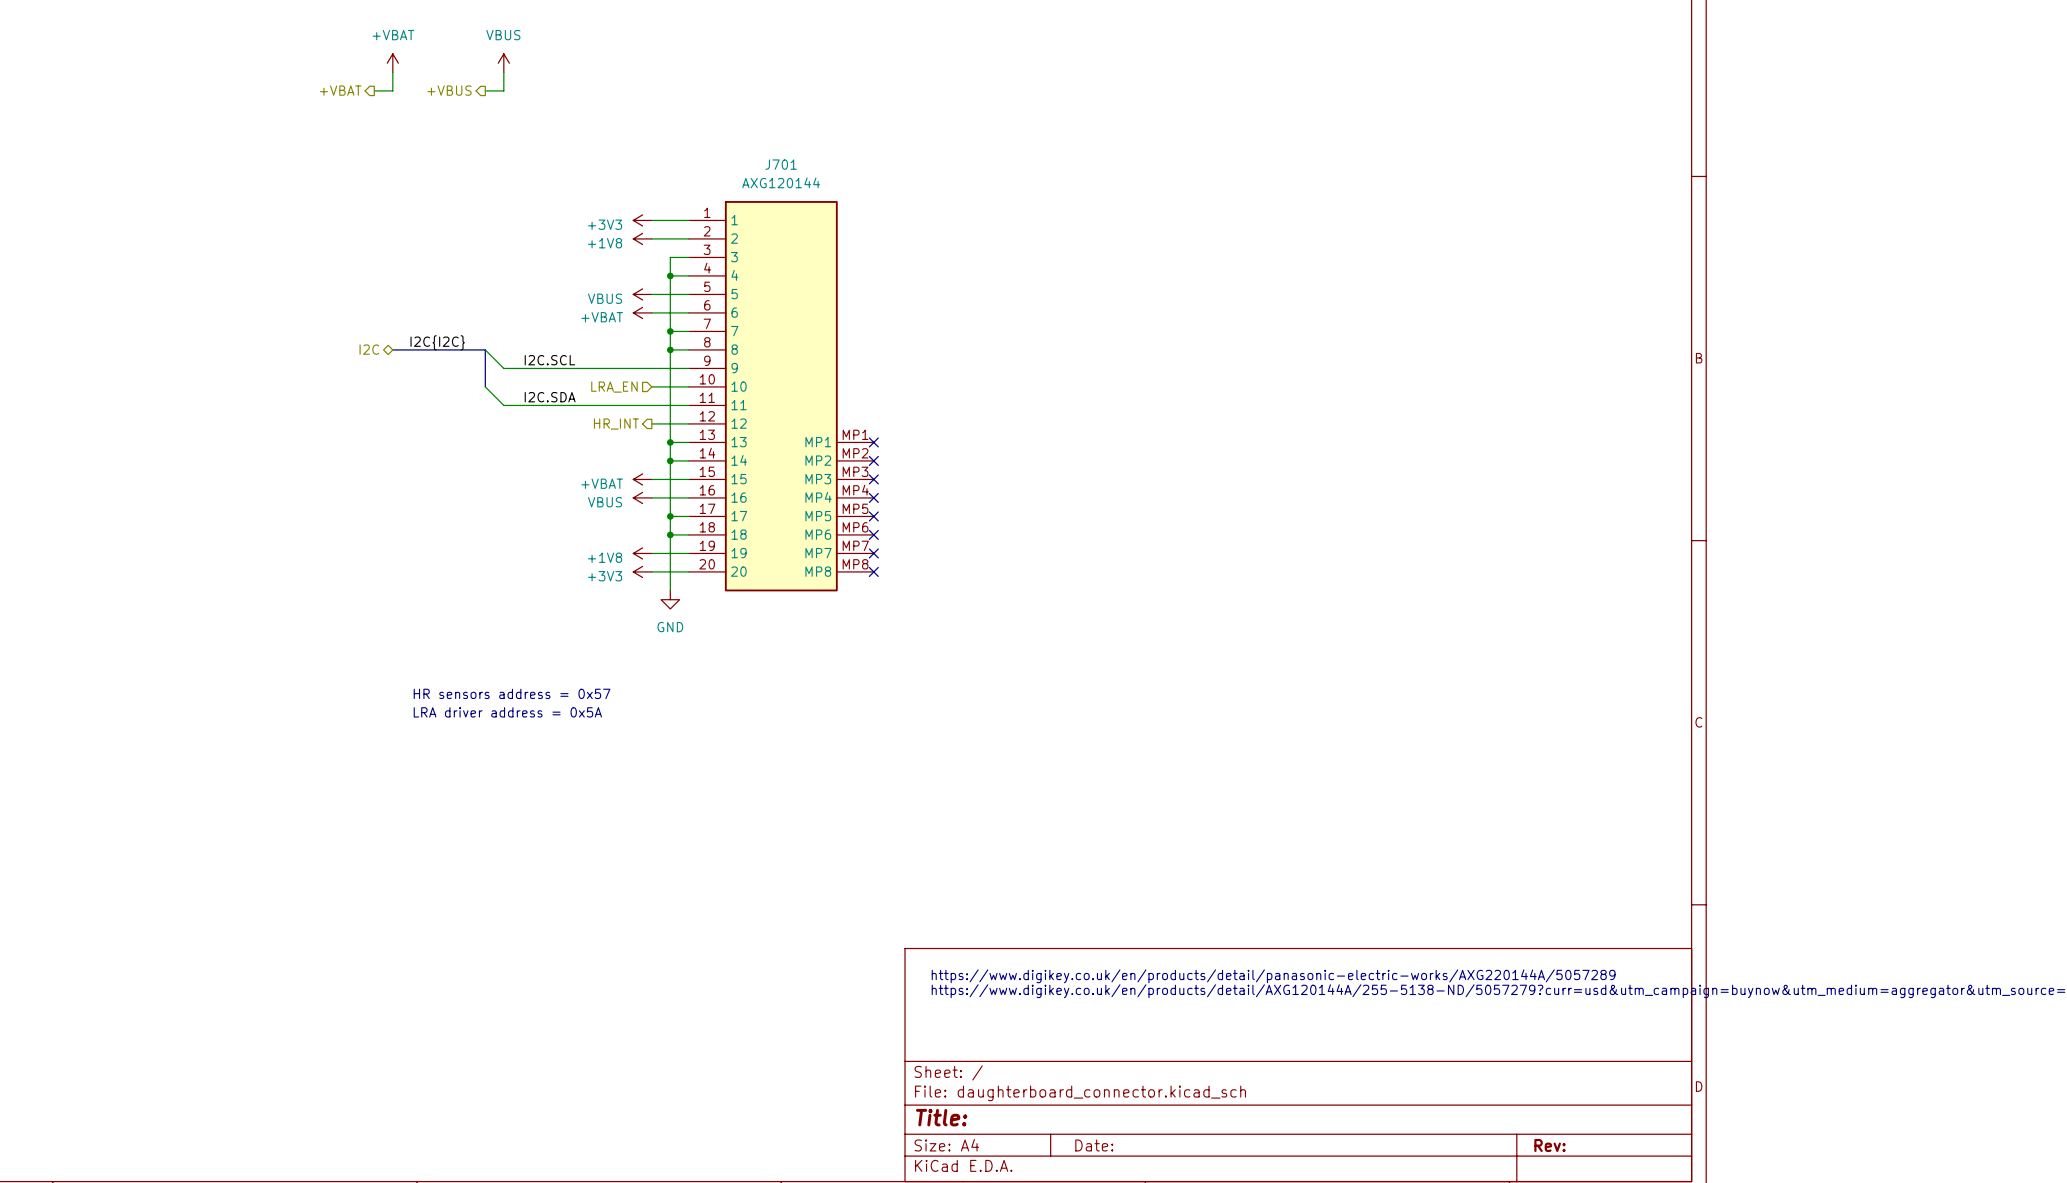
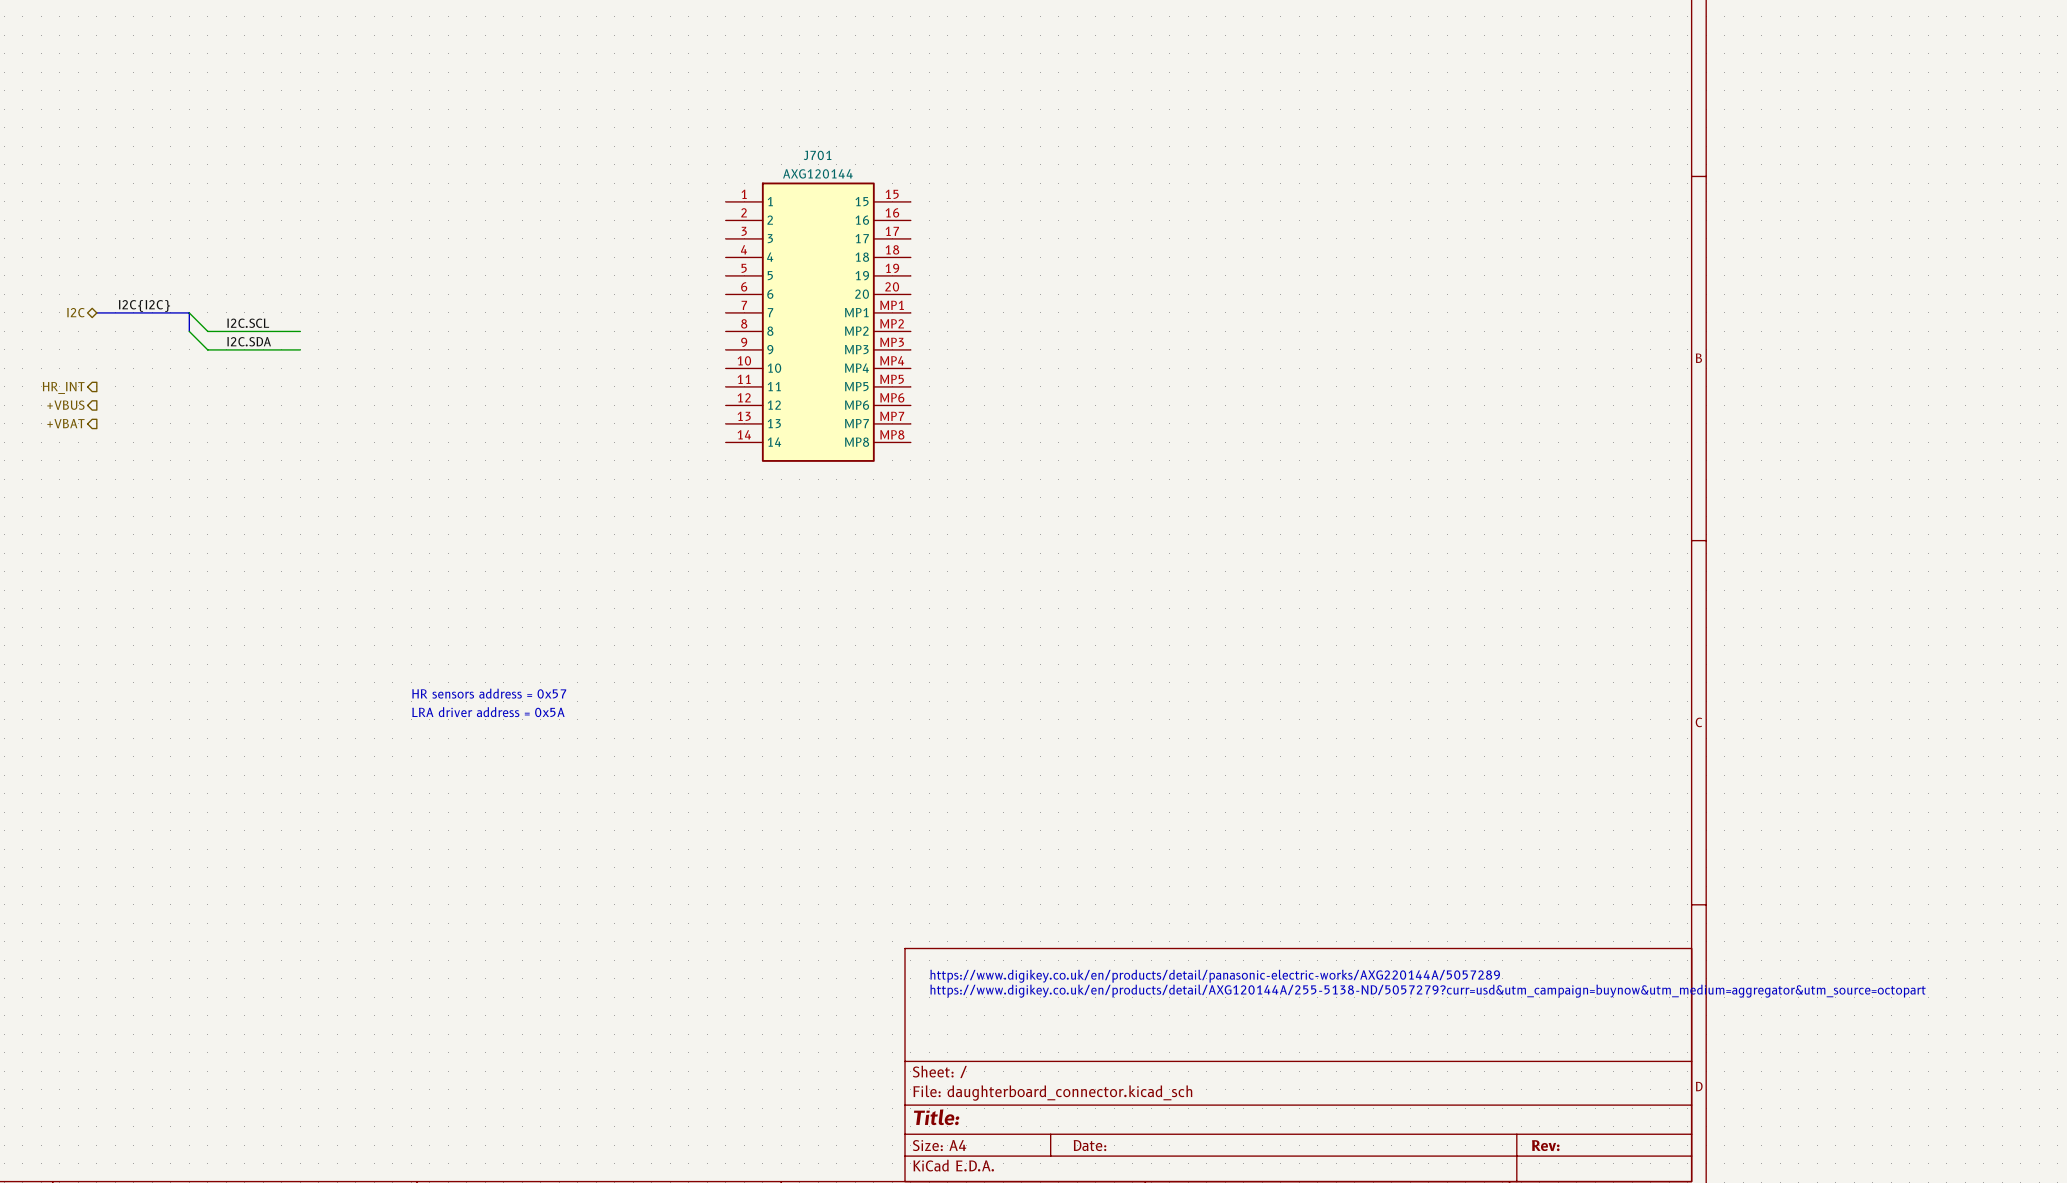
power symbol: +VBAT (392, 63) -> none
power symbol: VBUS (503, 63) -> none
wire: (392, 72) (392, 90) (374, 90) -> none
wire: (503, 72) (503, 90) (485, 90) -> none
hierarchical label: +VBAT (340, 90) -> none
hierarchical label: +VBUS (449, 90) -> none
J701 name position: J701 (781, 164) -> J701 (817, 155)
J701 value position: AXG120144 (781, 182) -> AXG120144 (817, 173)
J701 symbol: [688, 201, 874, 592] -> [725, 182, 911, 462]
power symbol: +3V3 (642, 220) -> none
wire: (651, 220) (688, 220) -> none
power symbol: +1V8 (642, 238) -> none
wire: (651, 238) (688, 238) -> none
wire: (688, 257) (670, 257) (670, 590) -> none
wire: (670, 275) (688, 275) -> none
junction: (670, 275) -> none
power symbol: VBUS (642, 294) -> none
wire: (651, 294) (688, 294) -> none
label: none -> I2C{I2C} (144, 305)
hierarchical label: none -> I2C (75, 312)
bus: none -> (96, 312) (189, 312) (189, 331)
wire: none -> (189, 312) (207, 331) (300, 331)
power symbol: +VBAT (642, 312) -> none
wire: (651, 312) (688, 312) -> none
label: none -> I2C.SCL (248, 323)
wire: none -> (189, 331) (207, 349) (300, 349)
wire: (670, 331) (688, 331) -> none
junction: (670, 331) -> none
label: none -> I2C.SDA (249, 341)
label: I2C{I2C} (437, 342) -> none
hierarchical label: I2C (369, 349) -> none
bus: (392, 349) (485, 349) (485, 386) -> none
wire: (485, 349) (503, 368) (688, 368) -> none
wire: (670, 349) (688, 349) -> none
junction: (670, 349) -> none
label: I2C.SCL (549, 360) -> none
wire: (485, 386) (503, 405) (688, 405) -> none
wire: (651, 386) (688, 386) -> none
hierarchical label: none -> HR_INT (63, 387)
hierarchical label: LRA_EN (614, 387) -> none
label: I2C.SDA (550, 397) -> none
hierarchical label: none -> +VBUS (65, 405)
hierarchical label: none -> +VBAT (65, 423)
wire: (651, 423) (688, 423) -> none
hierarchical label: HR_INT (616, 424) -> none
wire: (670, 442) (688, 442) -> none
junction: (670, 442) -> none
no-connect mark: (873, 442) -> none
wire: (670, 460) (688, 460) -> none
junction: (670, 460) -> none
no-connect mark: (873, 460) -> none
power symbol: +VBAT (642, 479) -> none
wire: (651, 479) (688, 479) -> none
no-connect mark: (873, 479) -> none
power symbol: VBUS (642, 497) -> none
wire: (651, 497) (688, 497) -> none
no-connect mark: (873, 497) -> none
wire: (670, 516) (688, 516) -> none
junction: (670, 516) -> none
no-connect mark: (873, 516) -> none
wire: (670, 534) (688, 534) -> none
junction: (670, 534) -> none
no-connect mark: (873, 534) -> none
power symbol: +1V8 (642, 553) -> none
wire: (651, 553) (688, 553) -> none
no-connect mark: (873, 553) -> none
power symbol: +3V3 (642, 571) -> none
wire: (651, 571) (688, 571) -> none
no-connect mark: (873, 571) -> none
power symbol: GND (670, 599) -> none

